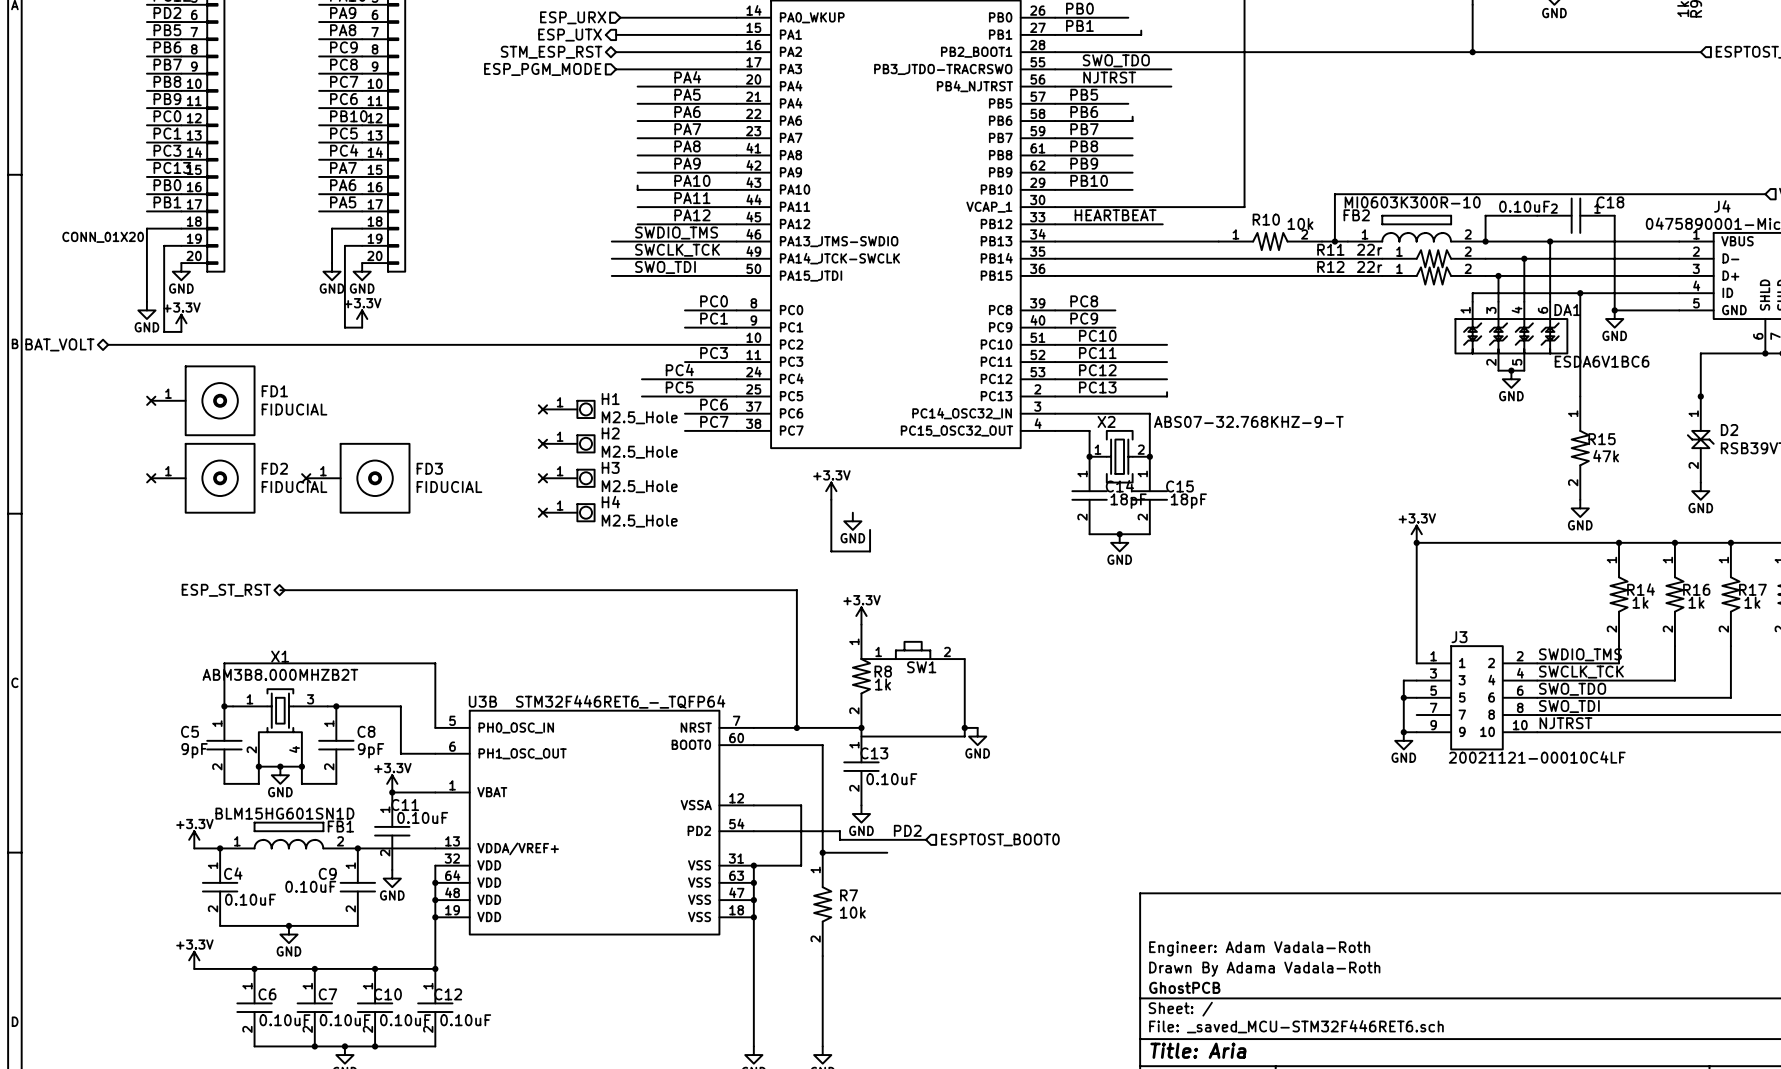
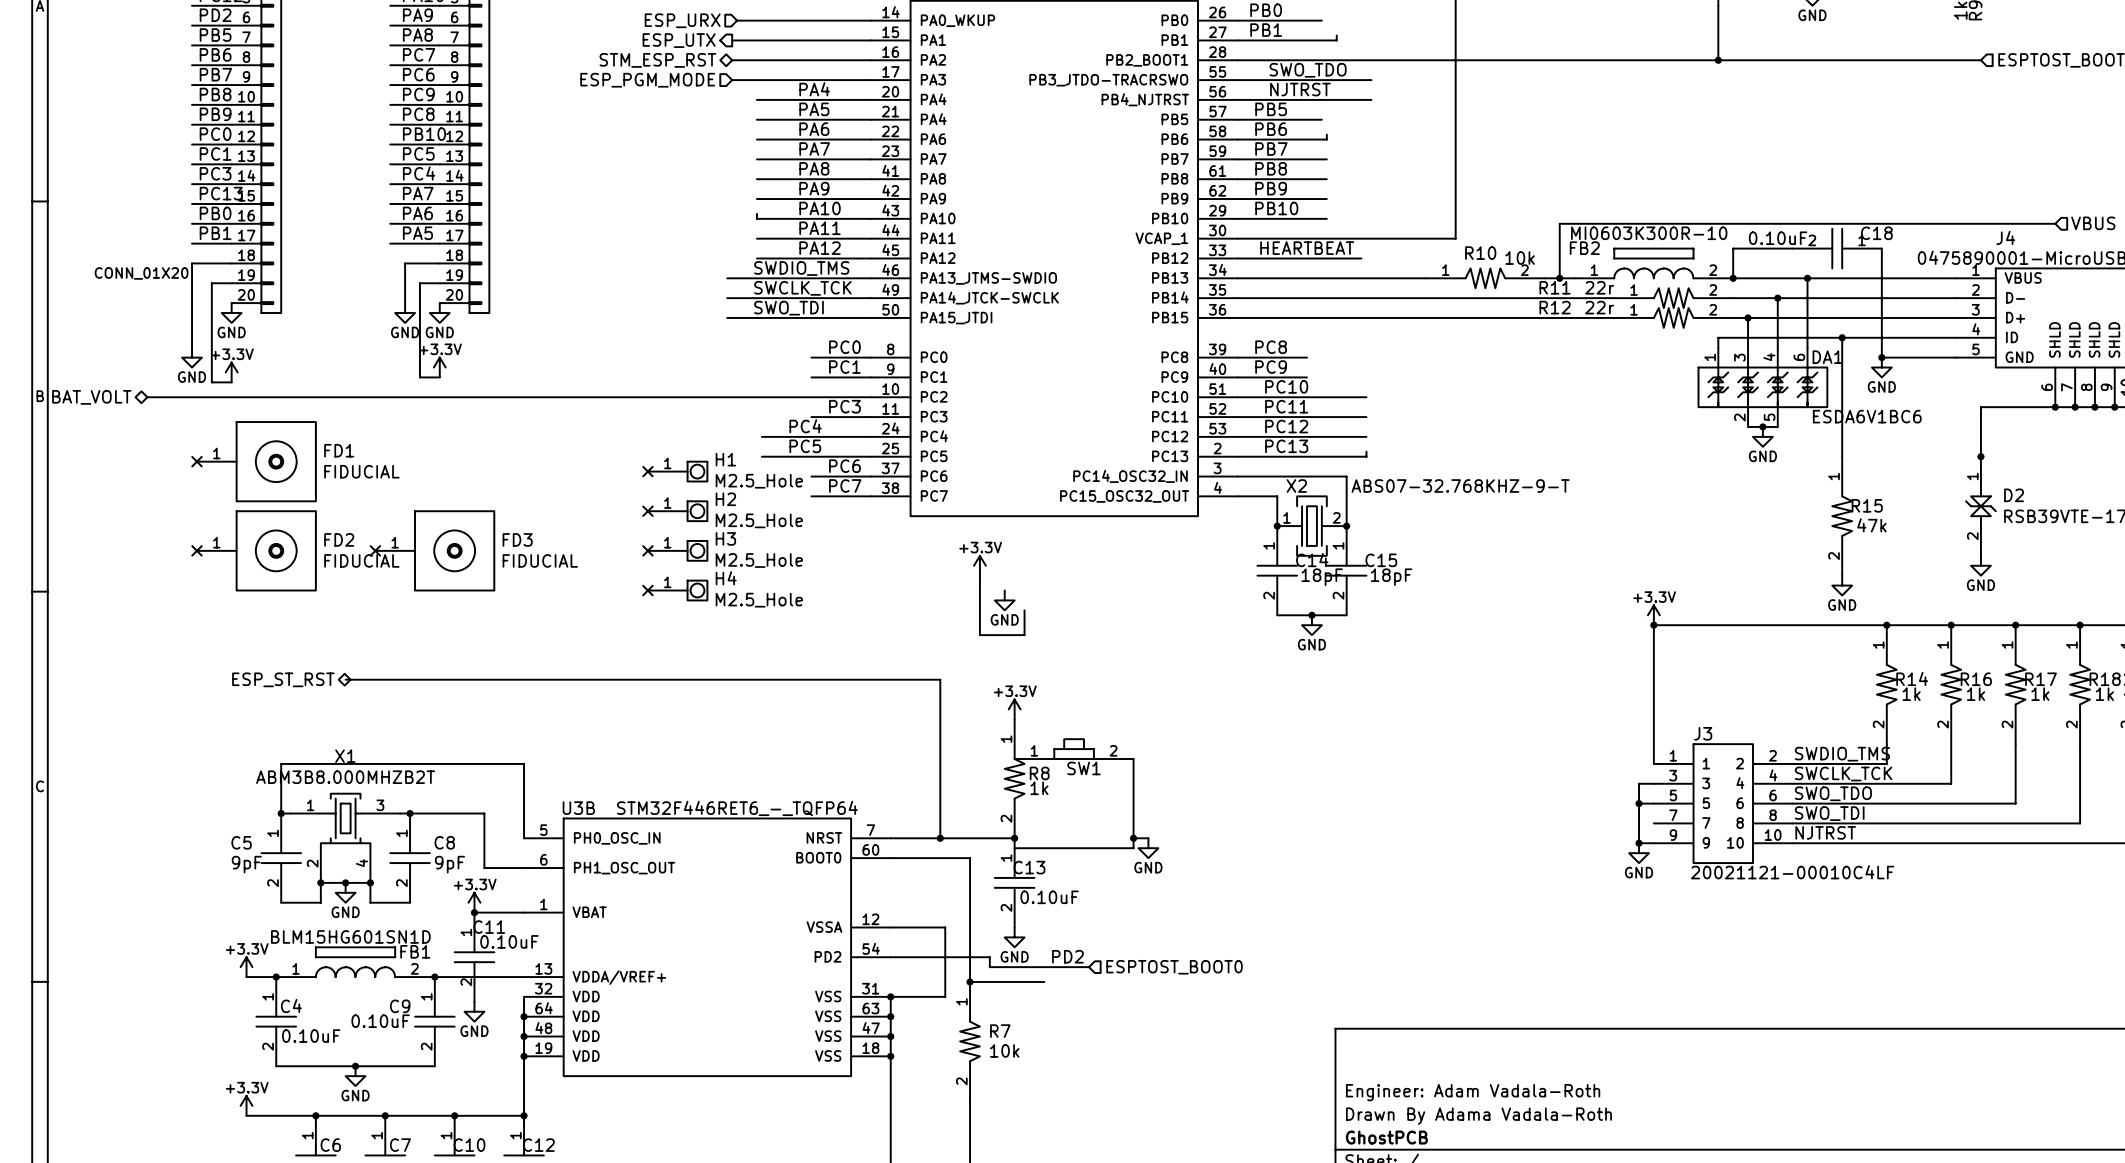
label: PC9 (343, 47) -> PC7 (419, 54)
label: PC8 (343, 64) -> PC6 (418, 74)
label: PC7 (344, 81) -> PC9 (418, 94)
label: PC6 (343, 99) -> PC8 (418, 114)

